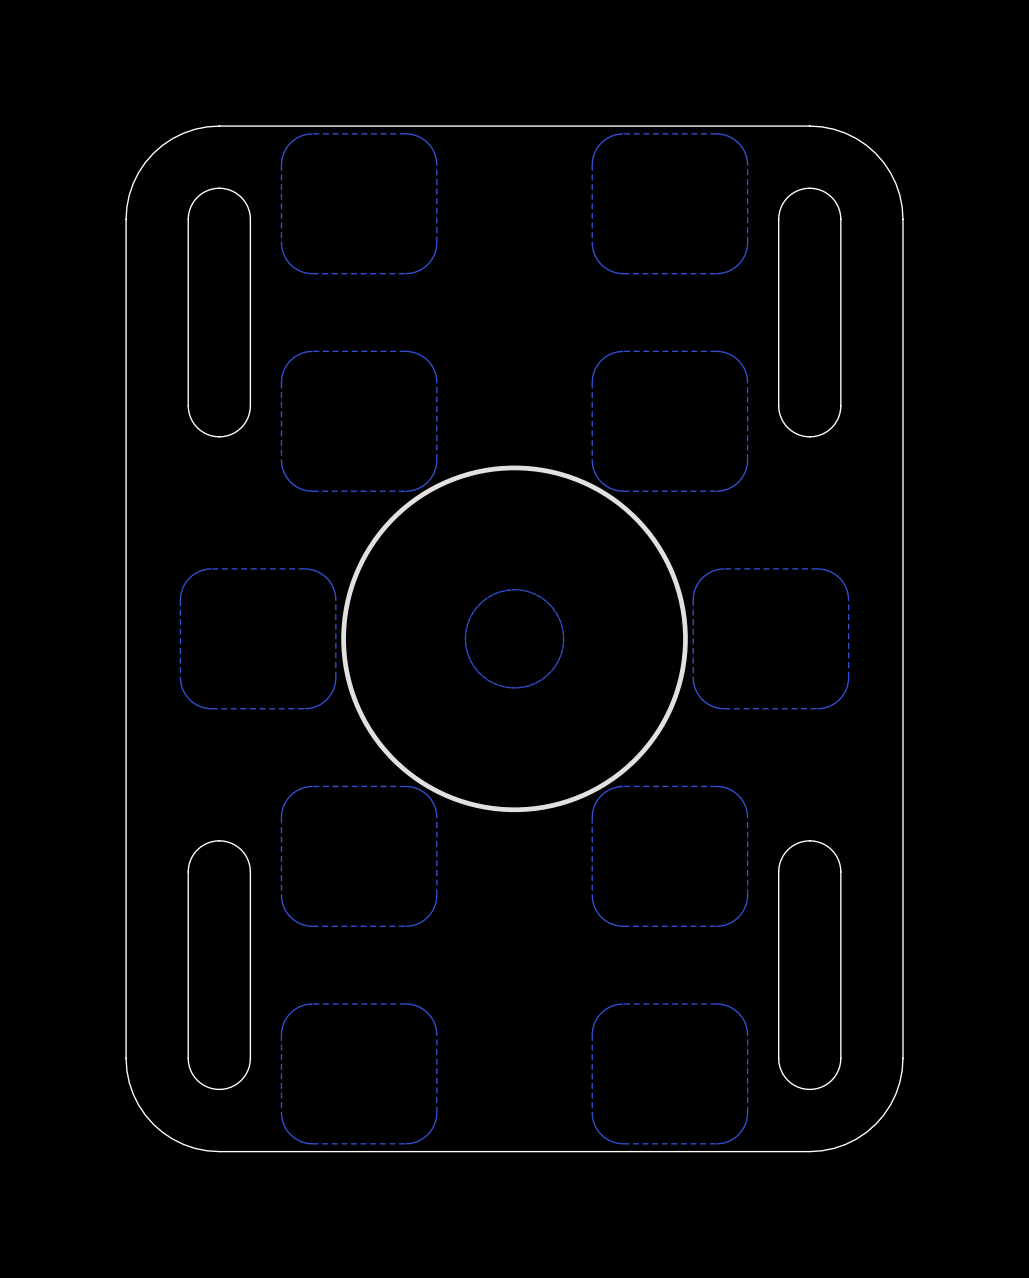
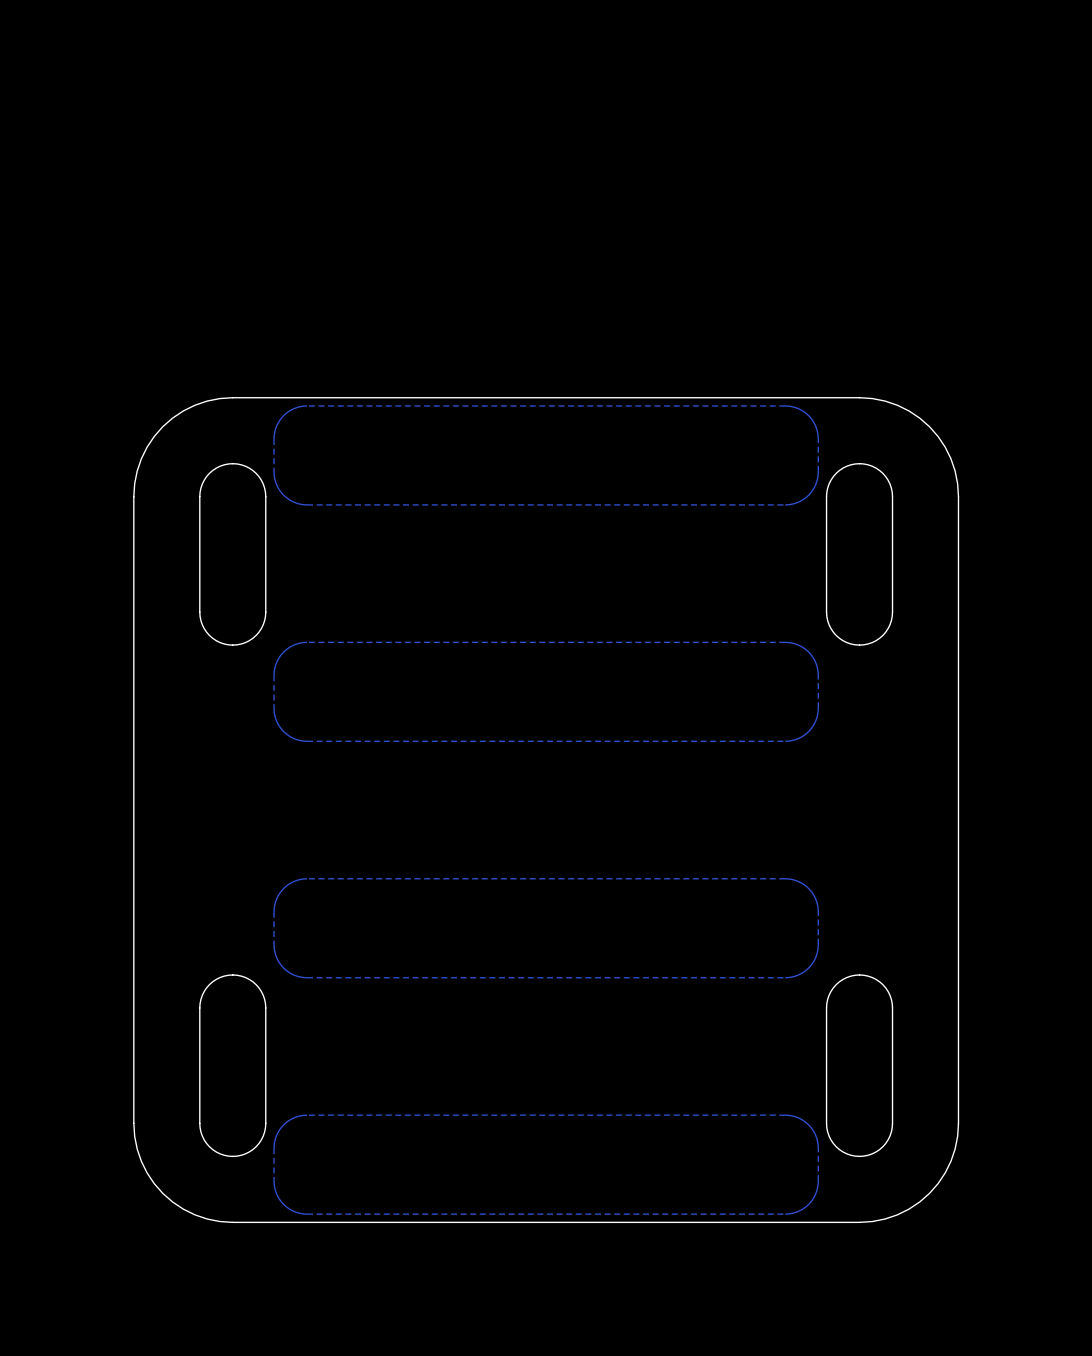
zone outline: (405, 133) (308, 134) (296, 138) (287, 146) (281, 160) (281, 242) (283, 254) (293, 267) (304, 272) (312, 273) (405, 273) (417, 271) (430, 261) (434, 254) (436, 242) (436, 160) (432, 149) (427, 142) (417, 136) (405, 133) -> none
zone outline: (716, 133) (728, 136) (738, 142) (745, 153) (747, 160) (747, 242) (745, 254) (741, 261) (728, 271) (716, 273) (623, 273) (615, 272) (604, 267) (596, 258) (592, 242) (592, 160) (598, 146) (607, 138) (619, 134) (716, 133) -> none
board edge: (219, 188) (207, 190) (197, 197) (190, 207) (188, 219) (188, 409) (192, 421) (200, 430) (207, 434) (219, 436) (231, 434) (241, 427) (248, 417) (250, 405) (250, 215) (246, 203) (238, 194) (231, 190) (219, 188) -> none
board edge: (809, 188) (797, 190) (787, 197) (781, 207) (778, 219) (778, 409) (782, 421) (790, 430) (797, 434) (809, 436) (821, 434) (831, 427) (838, 417) (840, 405) (840, 215) (836, 203) (828, 194) (821, 190) (809, 188) -> none
zone outline: (405, 351) (308, 351) (296, 355) (287, 363) (281, 378) (281, 460) (283, 472) (293, 484) (304, 490) (312, 491) (405, 491) (417, 488) (430, 479) (434, 472) (436, 460) (436, 378) (432, 366) (424, 357) (413, 352) (405, 351) -> none
zone outline: (716, 351) (724, 352) (735, 357) (743, 366) (747, 378) (747, 460) (745, 472) (741, 479) (728, 488) (716, 491) (623, 491) (615, 490) (604, 484) (596, 475) (592, 460) (592, 378) (598, 363) (607, 355) (619, 351) (716, 351) -> none
zone outline: none -> (785, 405) (797, 408) (808, 415) (815, 426) (818, 438) (818, 471) (815, 484) (805, 498) (789, 504) (307, 504) (298, 503) (286, 498) (278, 488) (274, 476) (274, 438) (276, 426) (286, 412) (302, 406) (785, 405)
board edge: none -> (232, 463) (220, 466) (209, 473) (202, 484) (199, 496) (200, 620) (206, 632) (212, 638) (220, 642) (232, 645) (245, 642) (256, 635) (263, 624) (265, 612) (264, 488) (258, 476) (252, 470) (245, 466) (232, 463)
board edge: none -> (859, 463) (846, 466) (836, 473) (829, 484) (826, 496) (827, 620) (833, 632) (839, 638) (846, 642) (859, 645) (872, 642) (882, 635) (890, 624) (892, 612) (891, 488) (885, 476) (879, 470) (872, 466) (859, 463)
drawing: [341, 465, 688, 813] -> none
board edge: (902, 467) (902, 219) (899, 195) (890, 172) (883, 162) (866, 145) (856, 138) (833, 129) (809, 126) (219, 126) (195, 129) (172, 138) (162, 145) (145, 162) (133, 183) (126, 207) (126, 467) -> (958, 496) (955, 471) (950, 458) (938, 436) (929, 426) (919, 418) (897, 405) (885, 401) (859, 397) (219, 398) (207, 401) (183, 410) (172, 418) (154, 436) (147, 447) (137, 471) (133, 496)
zone outline: (304, 568) (207, 569) (195, 573) (186, 581) (180, 595) (180, 677) (182, 689) (192, 702) (199, 706) (211, 708) (304, 708) (320, 704) (329, 696) (334, 685) (335, 677) (335, 595) (331, 584) (323, 575) (312, 569) (304, 568) -> none
zone outline: (817, 568) (825, 569) (836, 575) (844, 584) (848, 595) (848, 677) (846, 689) (842, 696) (833, 704) (817, 708) (724, 708) (716, 707) (705, 702) (695, 689) (693, 677) (693, 595) (699, 581) (708, 573) (720, 569) (817, 568) -> none
zone outline: (518, 589) (536, 594) (551, 606) (561, 623) (563, 642) (558, 660) (546, 675) (530, 685) (511, 687) (492, 682) (477, 671) (467, 654) (465, 635) (470, 616) (482, 601) (498, 592) (518, 589) -> none
zone outline: none -> (789, 642) (805, 649) (815, 662) (818, 675) (818, 708) (815, 720) (808, 731) (801, 736) (789, 741) (307, 741) (294, 738) (283, 731) (276, 720) (274, 712) (274, 675) (276, 662) (286, 649) (302, 642) (789, 642)
zone outline: (405, 786) (308, 786) (296, 790) (287, 798) (281, 813) (281, 895) (283, 907) (293, 919) (300, 923) (312, 926) (405, 926) (417, 923) (430, 914) (435, 903) (436, 895) (436, 813) (432, 801) (427, 795) (417, 788) (405, 786) -> none
zone outline: (716, 786) (728, 788) (738, 795) (745, 805) (747, 813) (747, 895) (746, 903) (741, 914) (728, 923) (716, 926) (623, 926) (611, 923) (604, 919) (596, 910) (592, 895) (592, 813) (598, 798) (607, 790) (619, 786) (716, 786) -> none
zone outline: none -> (785, 878) (797, 881) (808, 888) (815, 899) (818, 911) (818, 944) (815, 957) (805, 970) (789, 977) (307, 977) (294, 975) (283, 968) (276, 957) (274, 949) (274, 911) (276, 899) (286, 885) (302, 879) (785, 878)
board edge: (250, 949) (249, 863) (243, 852) (238, 847) (231, 843) (219, 840) (207, 843) (200, 847) (194, 852) (189, 863) (188, 949) -> (265, 1007) (263, 995) (256, 984) (245, 977) (232, 974) (220, 977) (209, 984) (202, 995) (199, 1007)
board edge: (840, 949) (839, 863) (834, 852) (828, 847) (821, 843) (809, 840) (797, 843) (790, 847) (785, 852) (779, 863) (778, 949) -> (892, 1007) (890, 995) (882, 984) (872, 977) (859, 974) (846, 977) (836, 984) (829, 995) (826, 1007)
zone outline: (405, 1143) (417, 1141) (427, 1134) (434, 1124) (436, 1112) (435, 1027) (432, 1019) (424, 1010) (417, 1006) (405, 1003) (308, 1004) (296, 1008) (285, 1019) (281, 1035) (282, 1120) (287, 1131) (293, 1137) (300, 1141) (312, 1143) -> (430, 1214) (661, 1214)
zone outline: (716, 1143) (728, 1141) (738, 1134) (745, 1124) (747, 1112) (746, 1027) (741, 1016) (735, 1010) (724, 1005) (716, 1003) (619, 1004) (604, 1010) (596, 1019) (592, 1035) (593, 1120) (596, 1128) (604, 1137) (611, 1141) (623, 1143) -> (760, 1214) (789, 1213) (797, 1211) (808, 1204) (815, 1193) (818, 1181) (817, 1139) (808, 1124) (797, 1117) (785, 1115) (307, 1115) (294, 1117) (280, 1128) (275, 1139) (274, 1181) (276, 1193) (283, 1204) (294, 1211) (302, 1213) (331, 1214)

